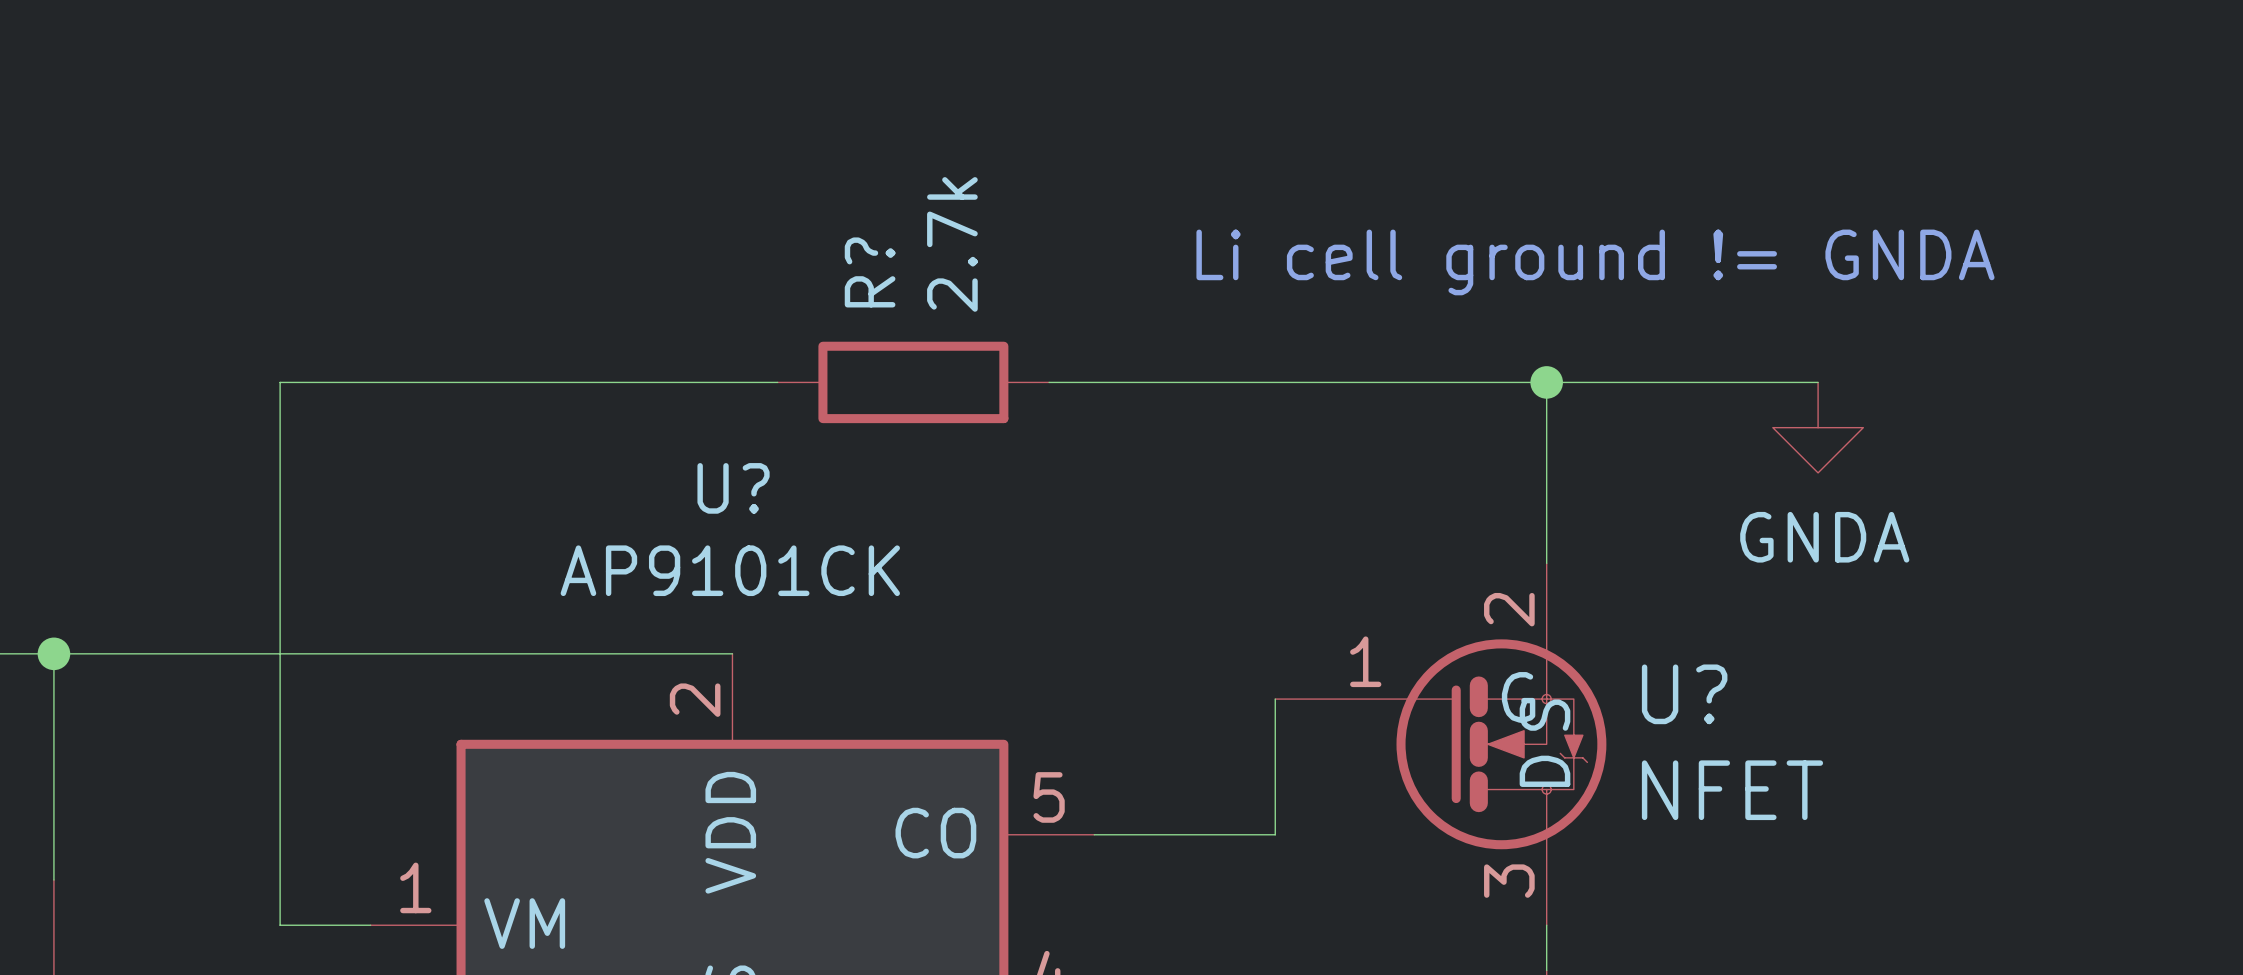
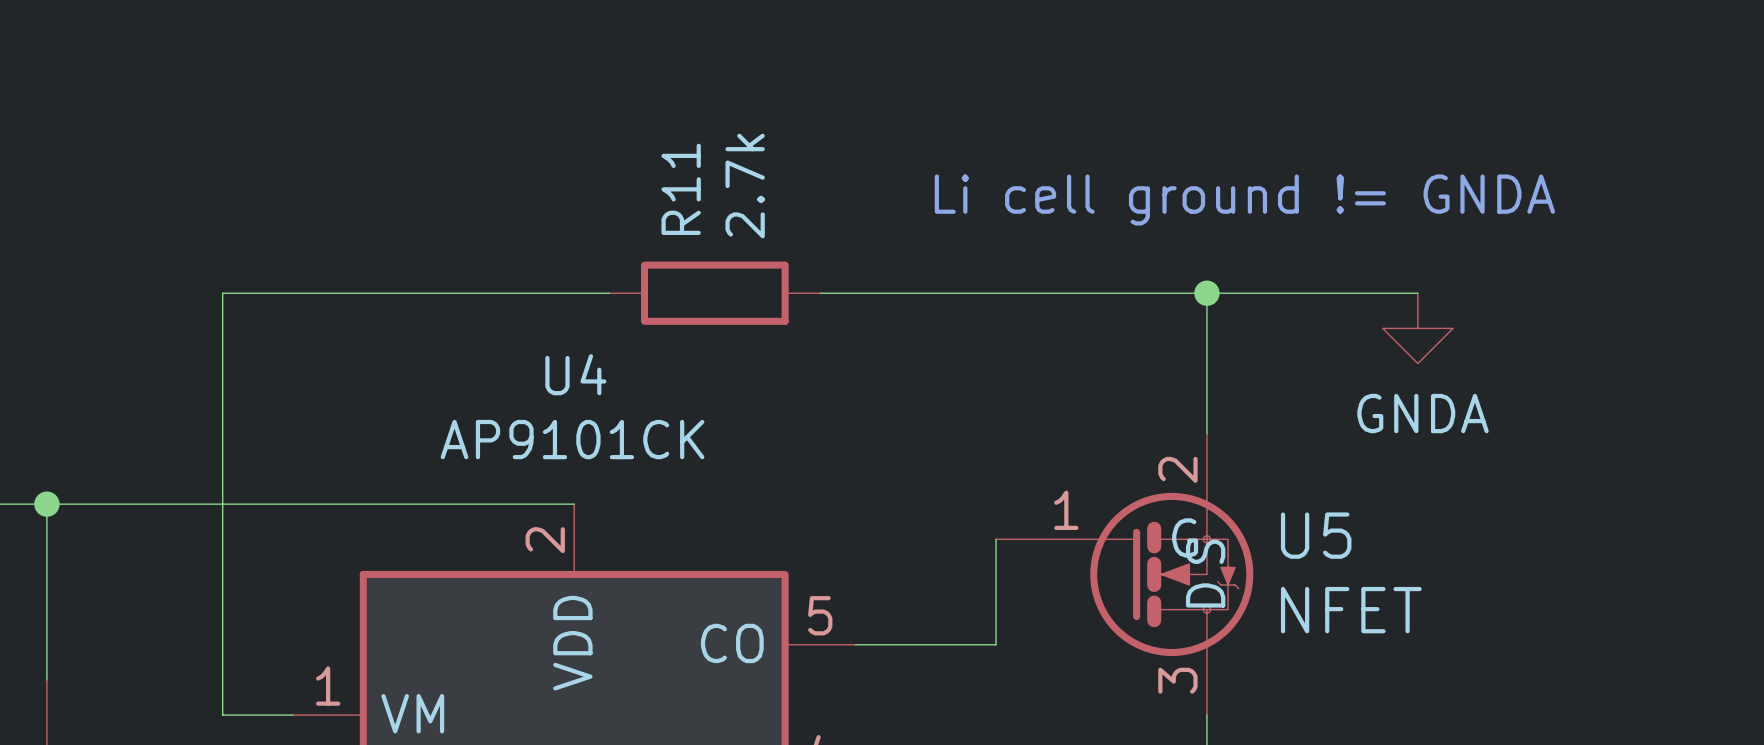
R? name: R? (870, 272) -> R11 (681, 189)
U? name: U? (733, 488) -> U4 (575, 374)
U? name: U? (1684, 694) -> U5 (1316, 535)

